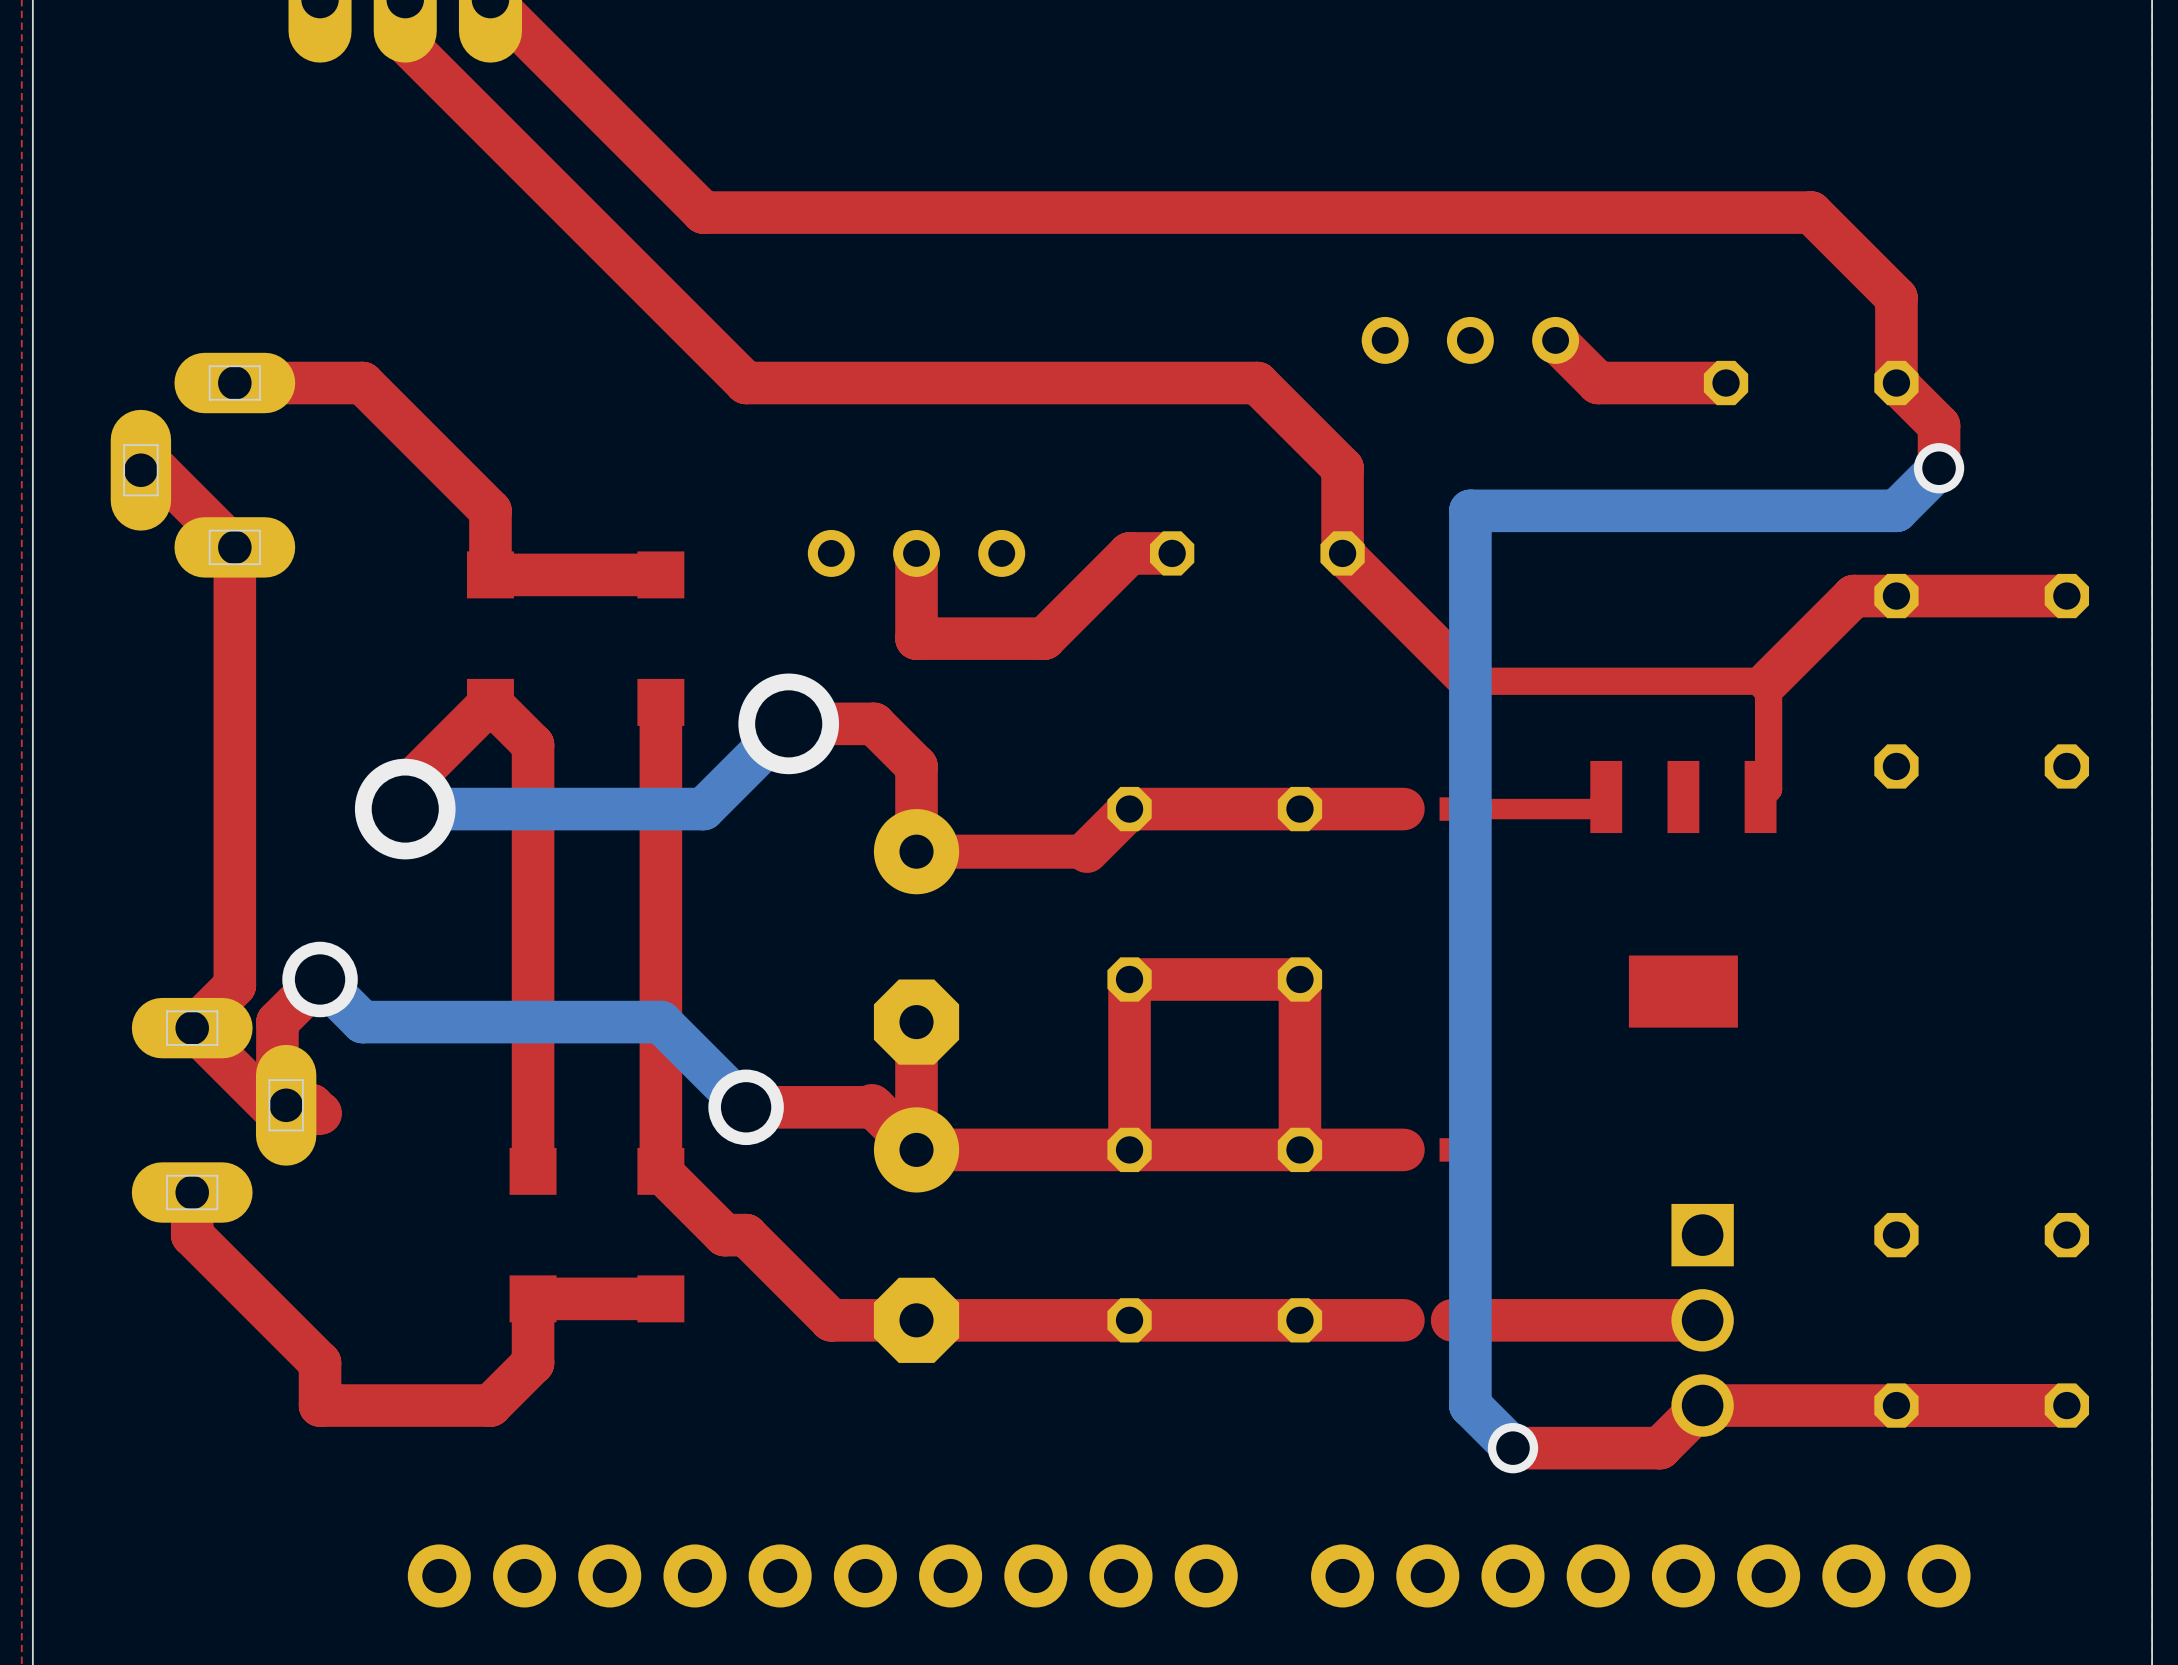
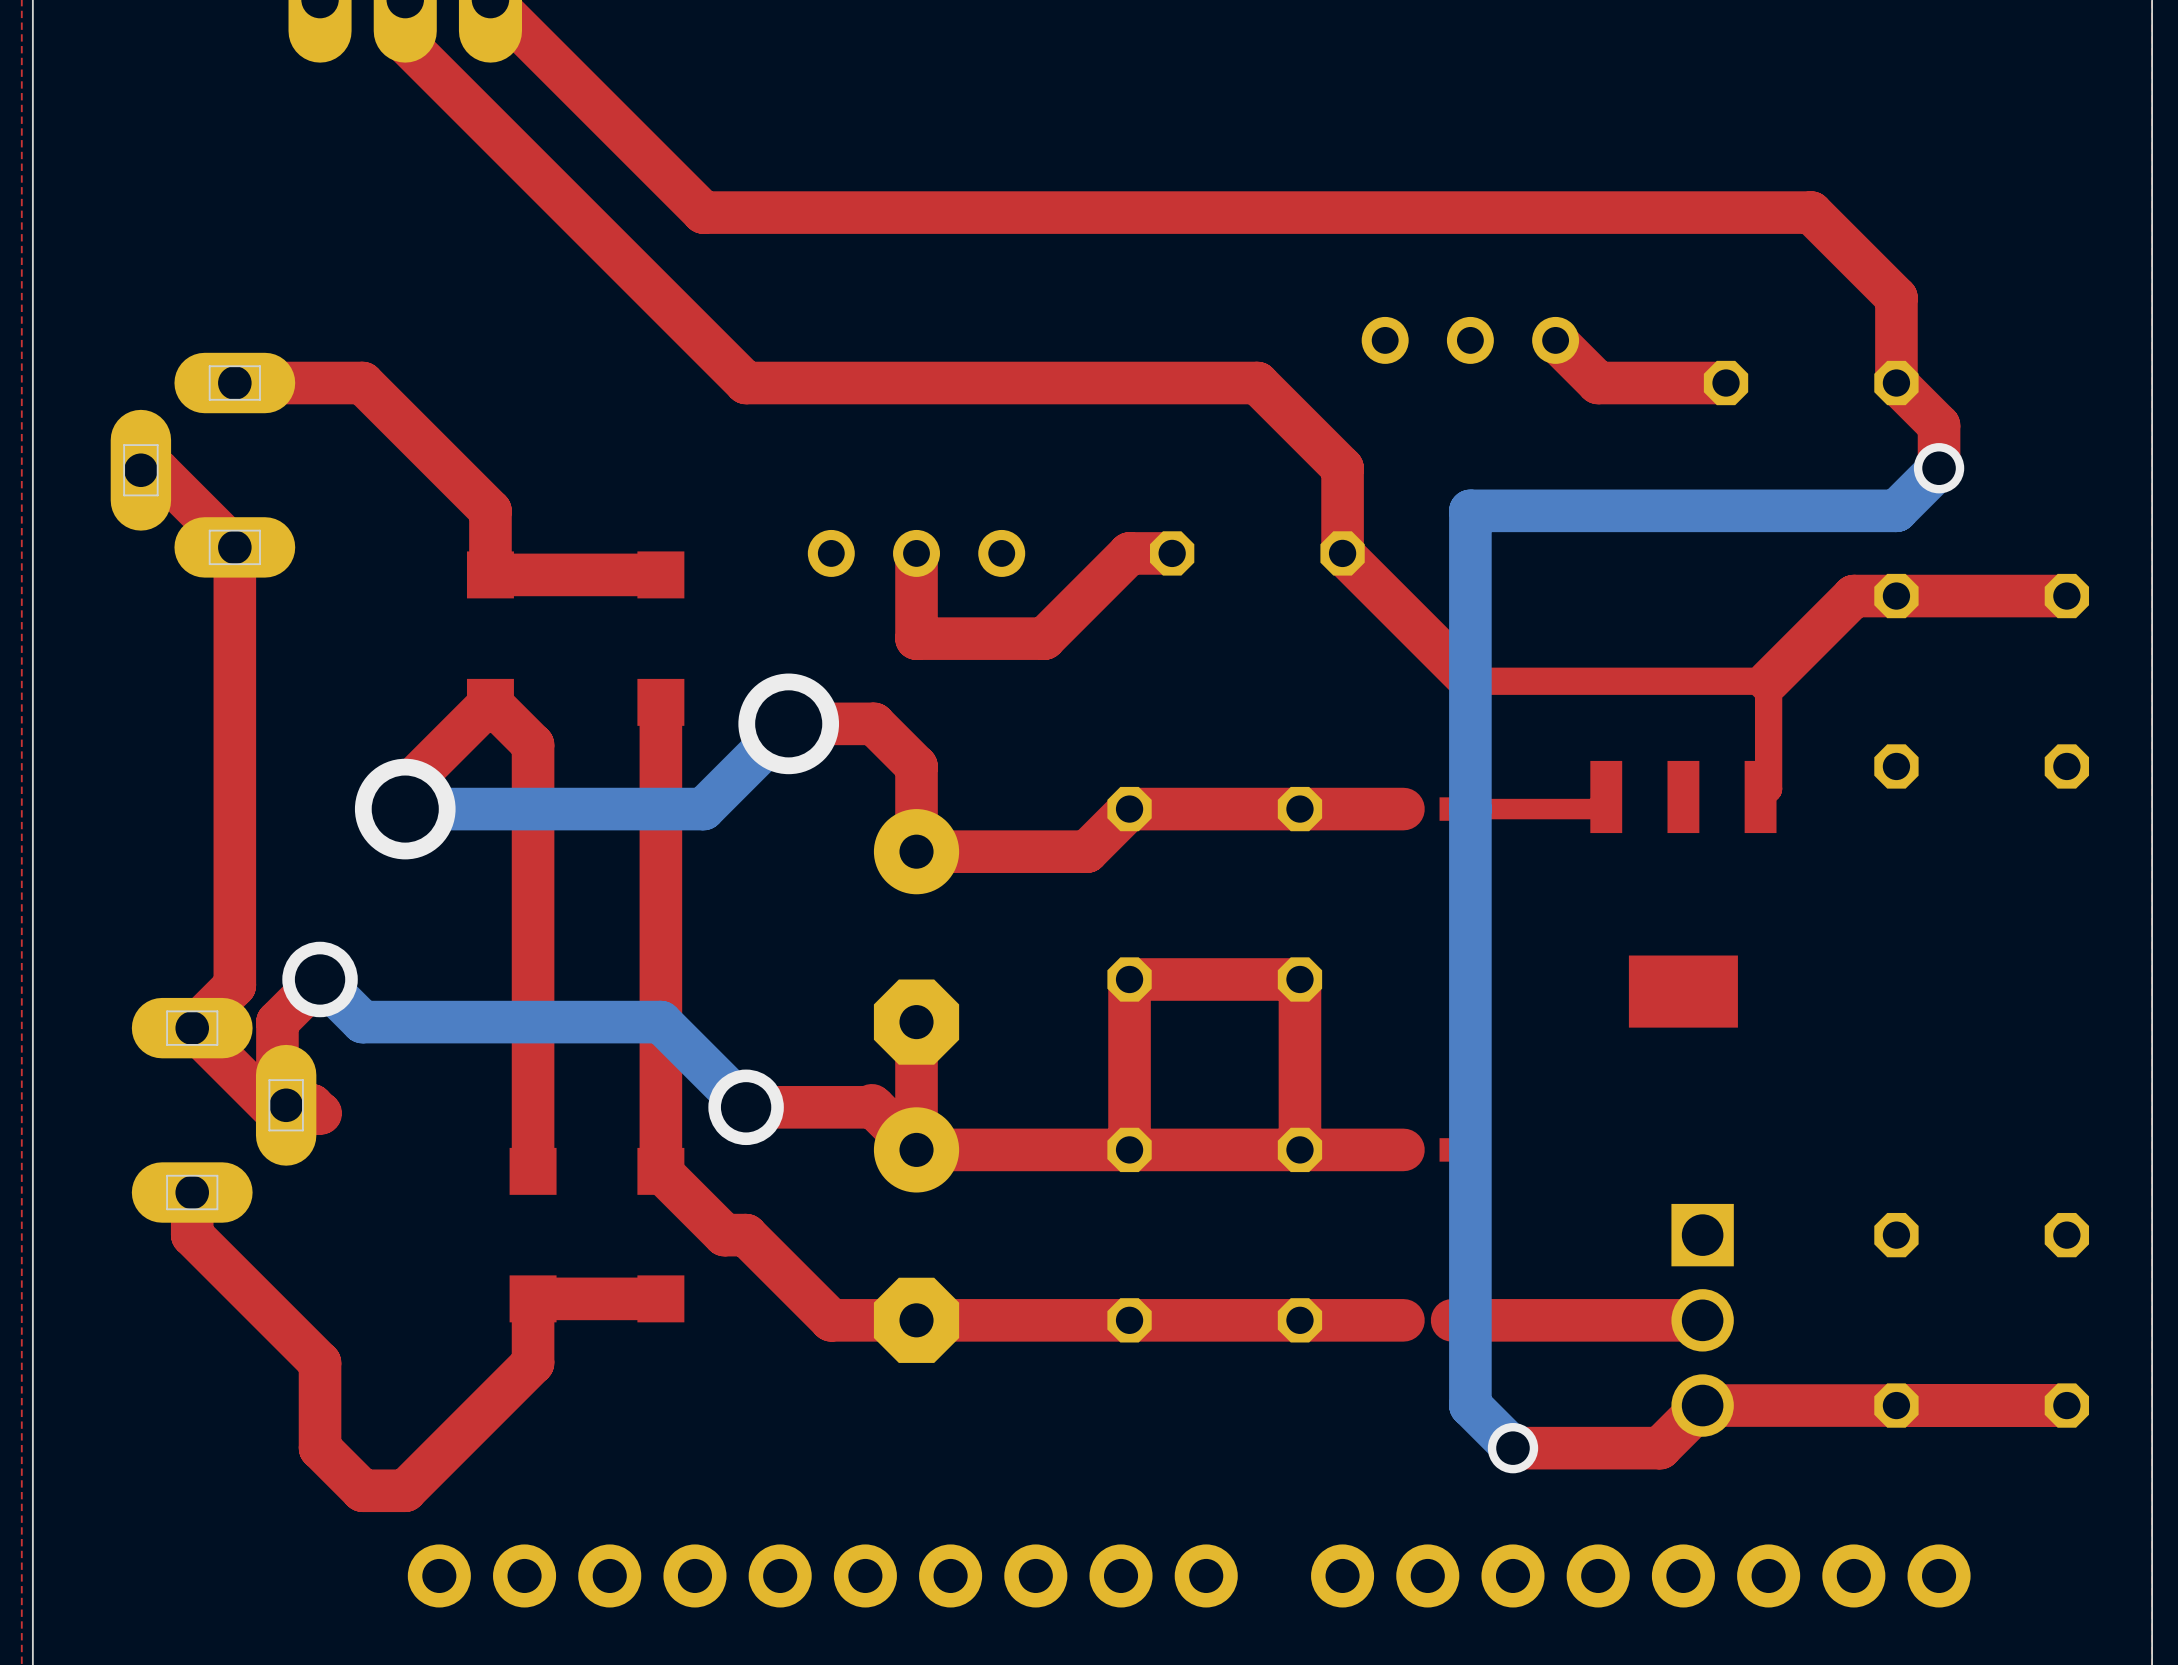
top track width: thin (1086, 851) (916, 851) -> thick (1086, 851) (916, 851)
top track: (490, 1405) (320, 1405) -> (490, 1405) (405, 1490) (362, 1490) (320, 1448) (320, 1405)

